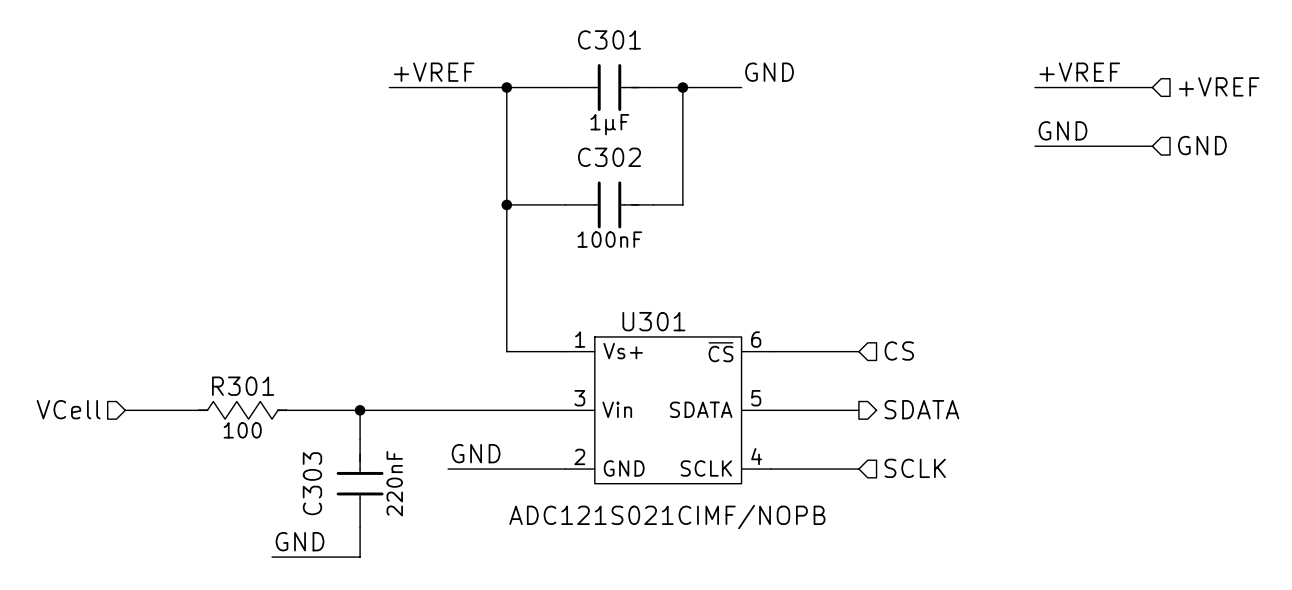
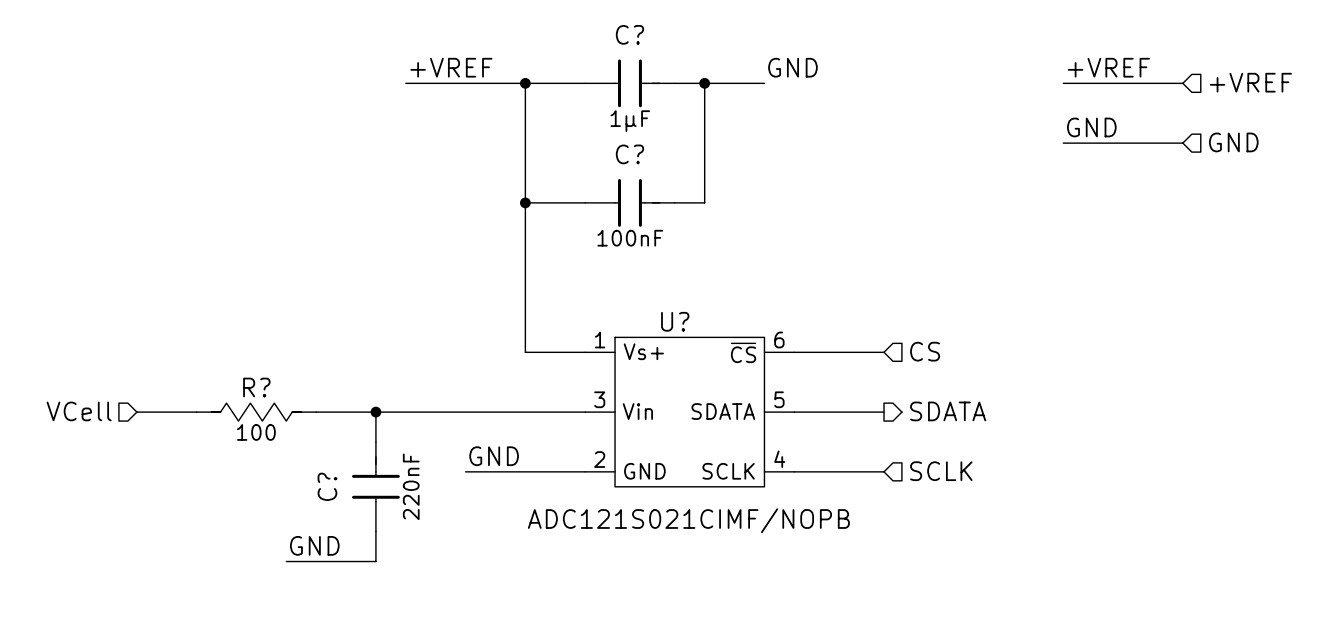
C301 name: C301 (609, 39) -> C? (629, 34)
C302 name: C302 (609, 157) -> C? (629, 154)
U301 name: U301 (653, 321) -> U? (675, 321)
R301 name: R301 (243, 386) -> R? (256, 387)
C303 name: C303 (312, 483) -> C? (327, 486)

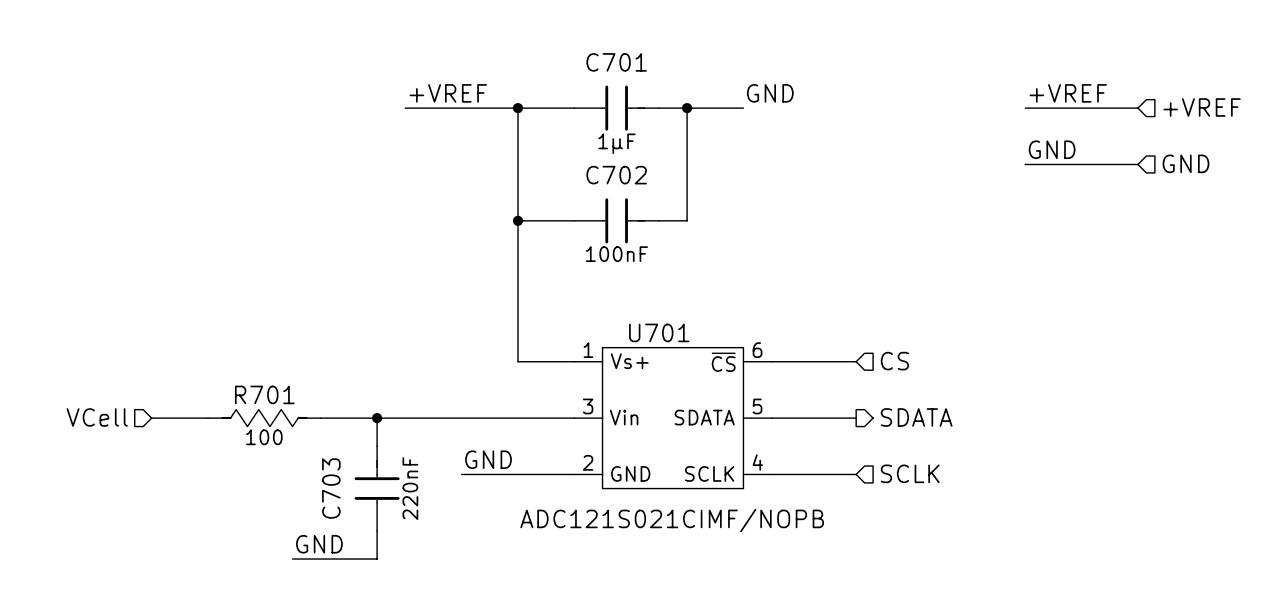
C? name: C? (629, 34) -> C701 (616, 62)
C? name: C? (629, 154) -> C702 (616, 175)
U? name: U? (675, 321) -> U701 (659, 332)
R? name: R? (256, 387) -> R701 (264, 394)
C? name: C? (327, 486) -> C703 (331, 488)

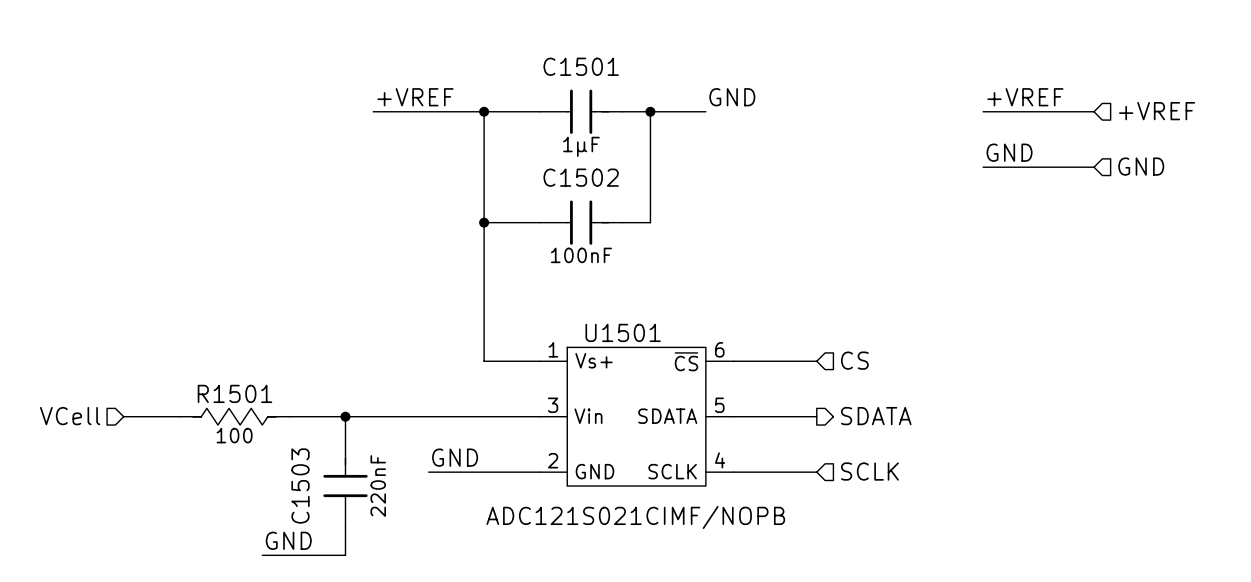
C701 name: C701 (616, 62) -> C1501 (581, 66)
C702 name: C702 (616, 175) -> C1502 (581, 177)
U701 name: U701 (659, 332) -> U1501 (623, 332)
R701 name: R701 (264, 394) -> R1501 (234, 393)
C703 name: C703 (331, 488) -> C1503 (300, 486)

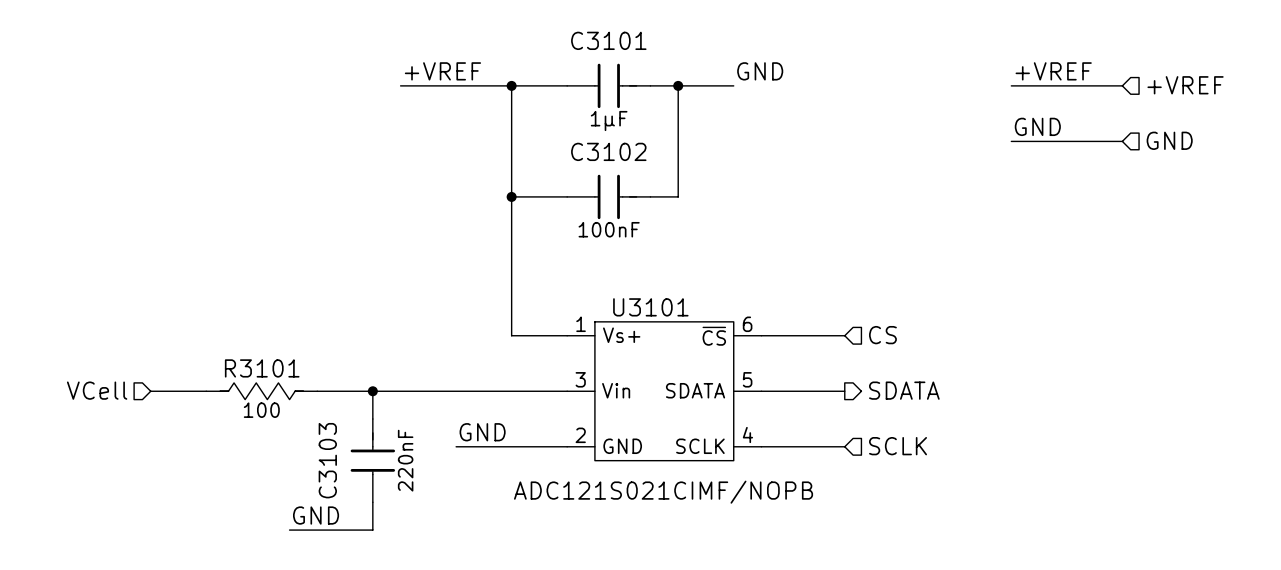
C1501 name: C1501 (581, 66) -> C3101 (608, 40)
C1502 name: C1502 (581, 177) -> C3102 (608, 151)
U1501 name: U1501 (623, 332) -> U3101 (650, 307)
R1501 name: R1501 (234, 393) -> R3101 (262, 368)
C1503 name: C1503 (300, 486) -> C3103 (327, 460)

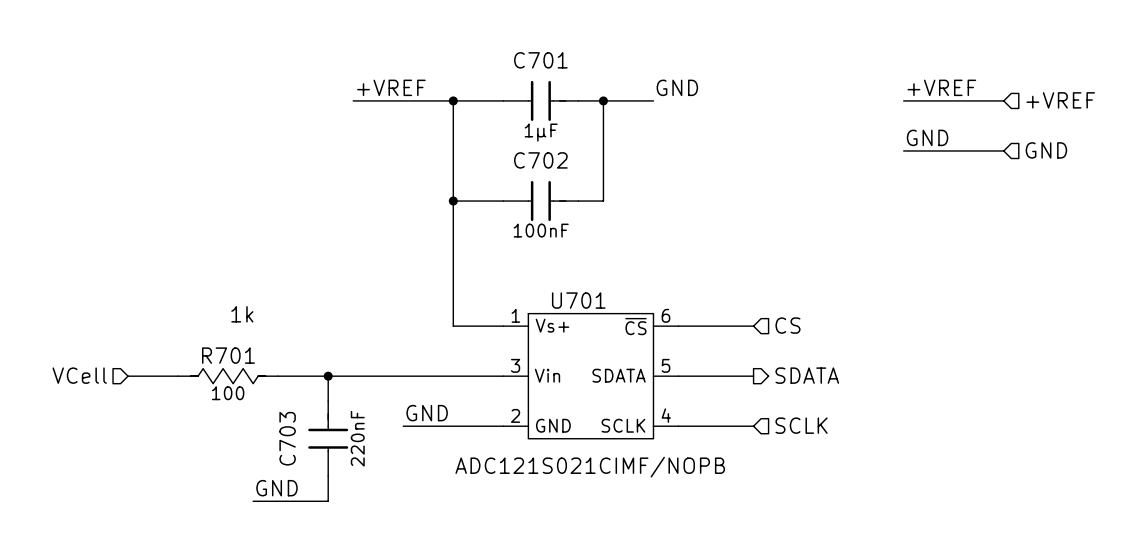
C3101 name: C3101 (608, 40) -> C701 (540, 60)
C3102 name: C3102 (608, 151) -> C702 (540, 160)
U3101 name: U3101 (650, 307) -> U701 (578, 300)
text: none -> 1k (242, 314)
R3101 name: R3101 (262, 368) -> R701 (228, 355)
C3103 name: C3103 (327, 460) -> C703 (287, 438)

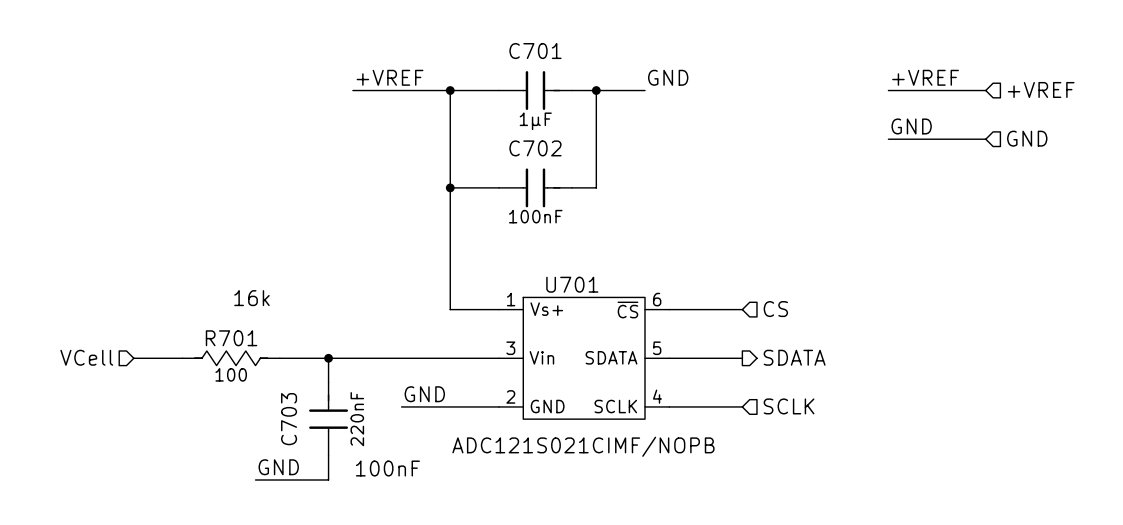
text: 1k (242, 314) -> 16k (251, 298)
text: none -> 100nF (387, 468)

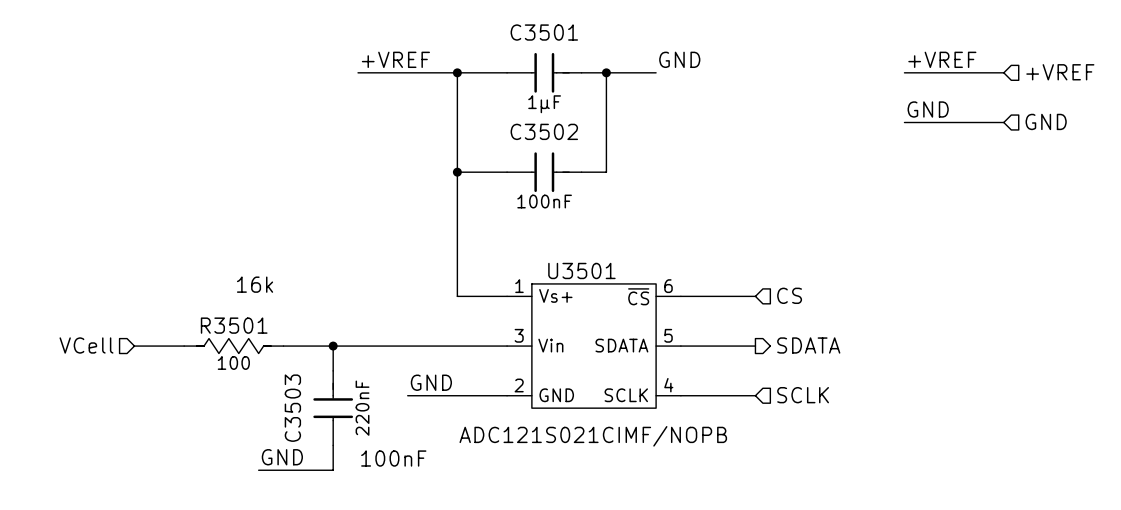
C701 name: C701 (535, 51) -> C3501 (544, 32)
C702 name: C702 (535, 148) -> C3502 (544, 131)
U701 name: U701 (572, 284) -> U3501 (581, 270)
R701 name: R701 (231, 338) -> R3501 (234, 325)
C703 name: C703 (289, 419) -> C3503 (292, 408)

